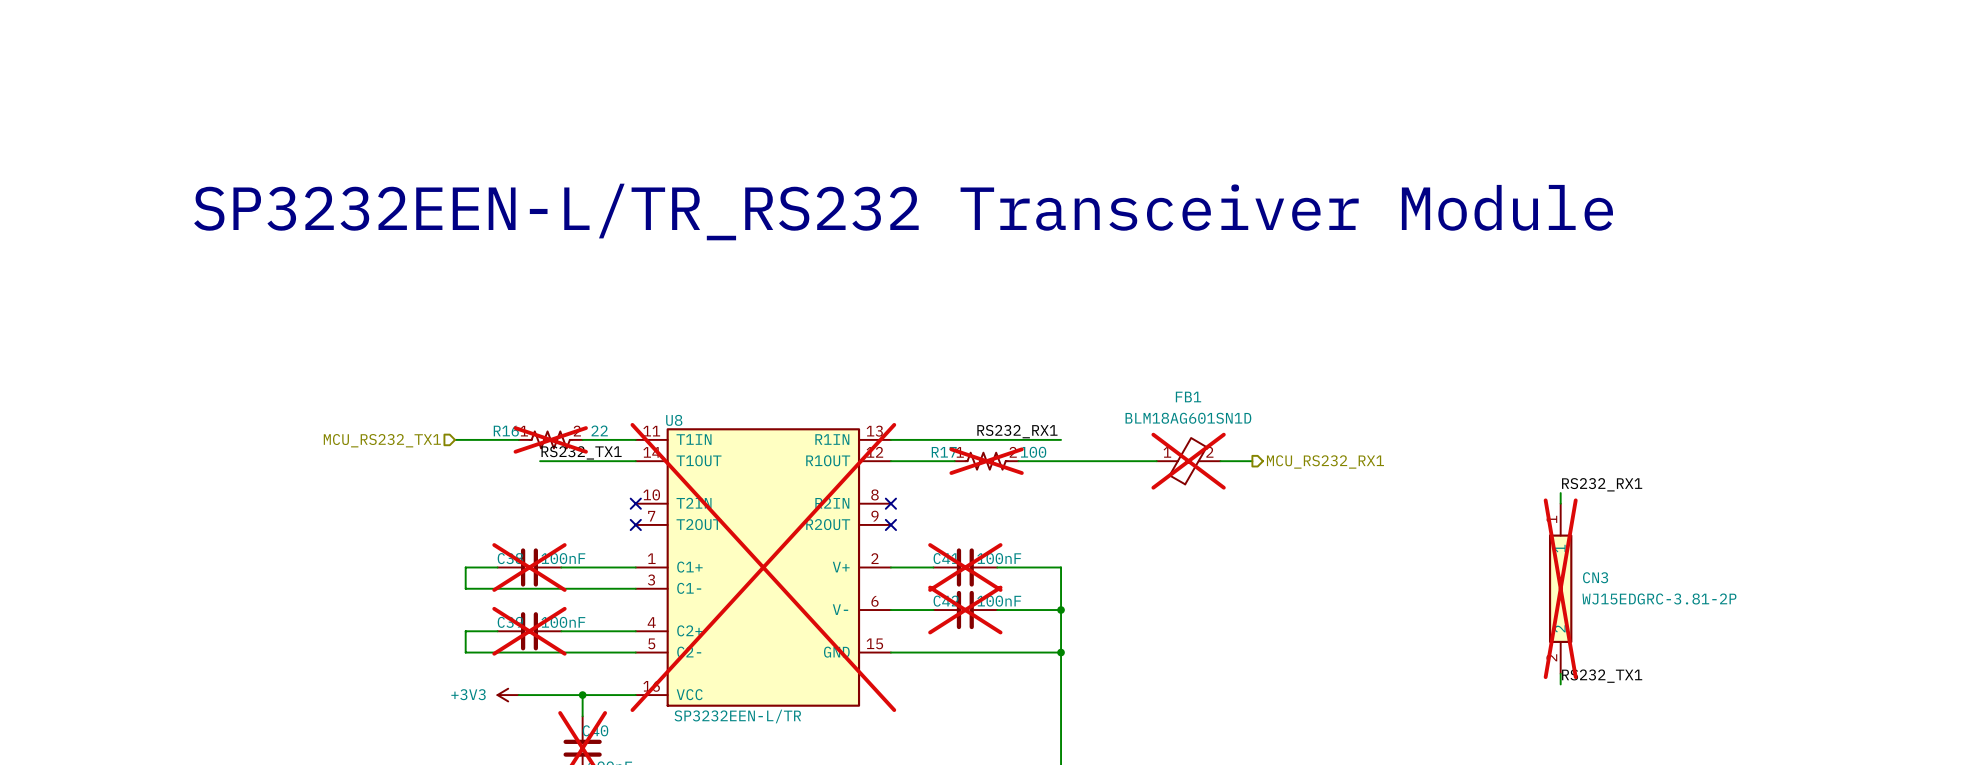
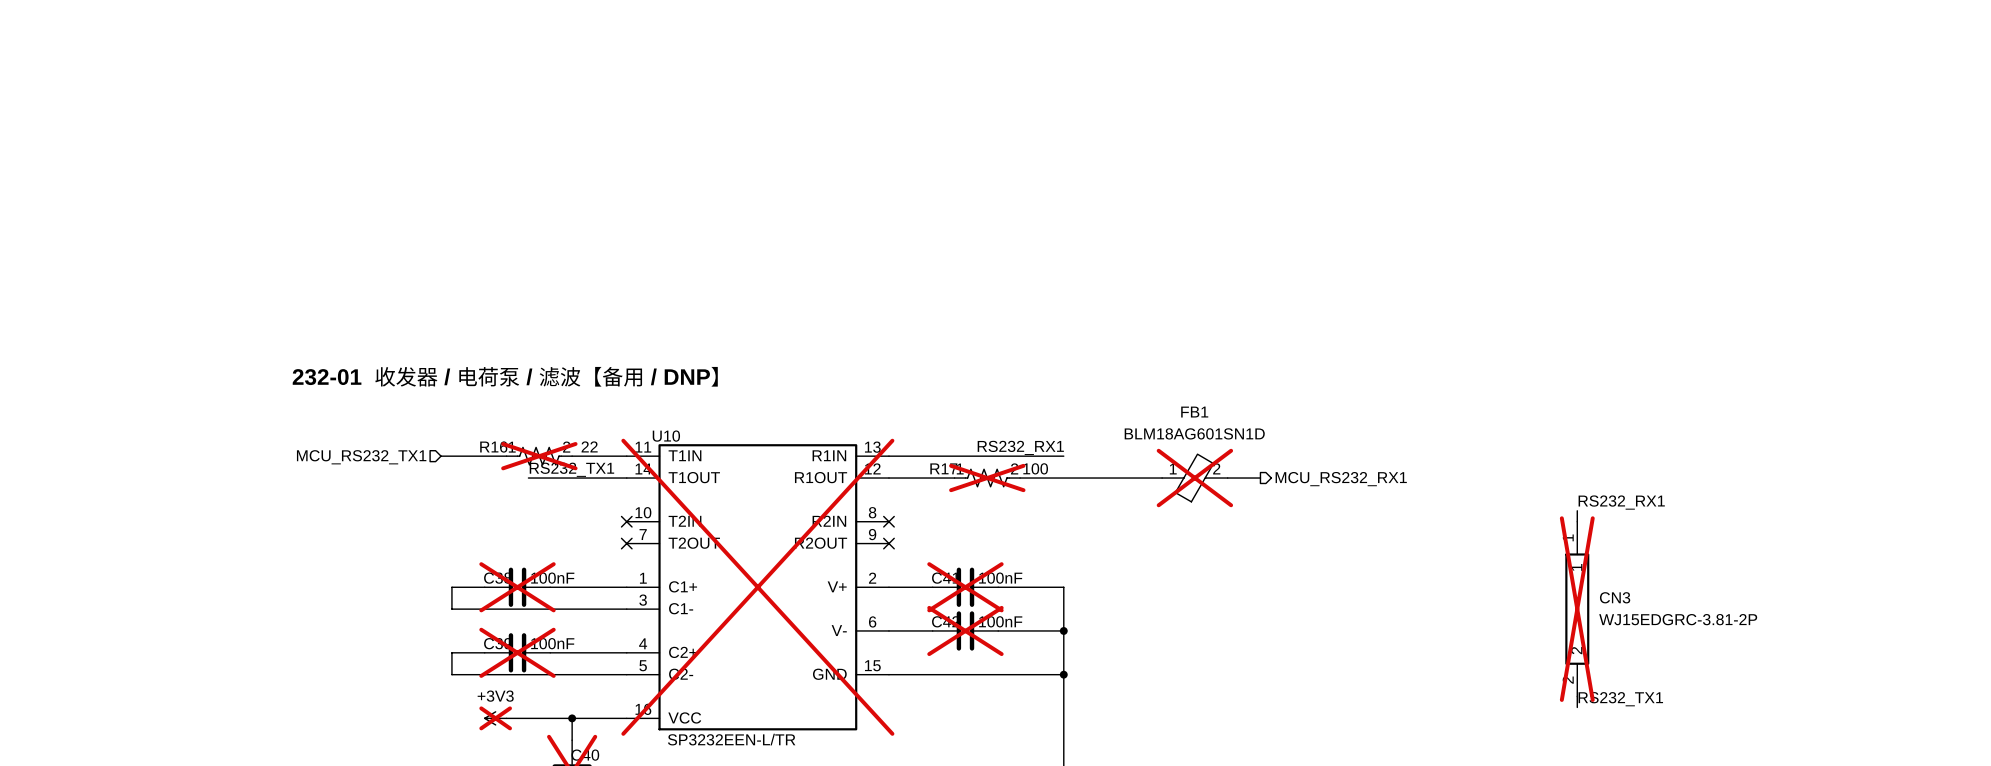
text: SP3232EEN-L/TR_RS232 Transceiver Module (903, 211) -> none
text: none -> 232-01 收发器 / 电荷泵 / 滤波【备用 / DNP】 (505, 376)
U8 name: U8 (674, 420) -> U10 (666, 436)
power symbol text position: +3V3 (468, 694) -> +3V3 (495, 696)
power symbol do-not-place cross: none -> (495, 718)

